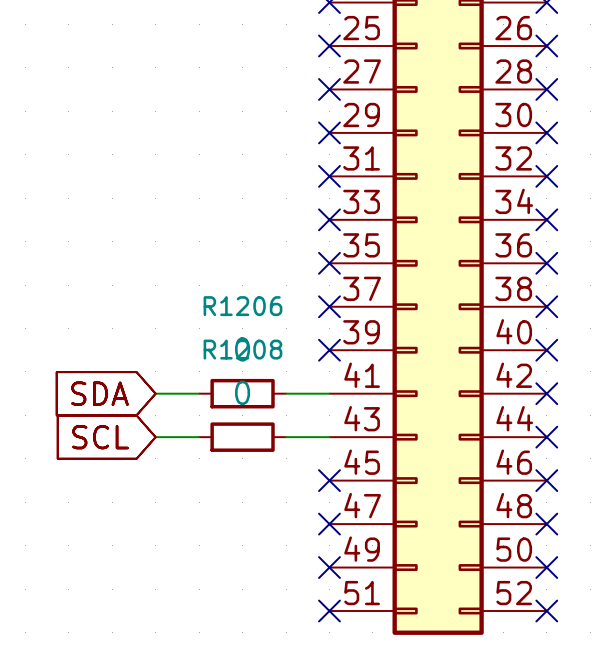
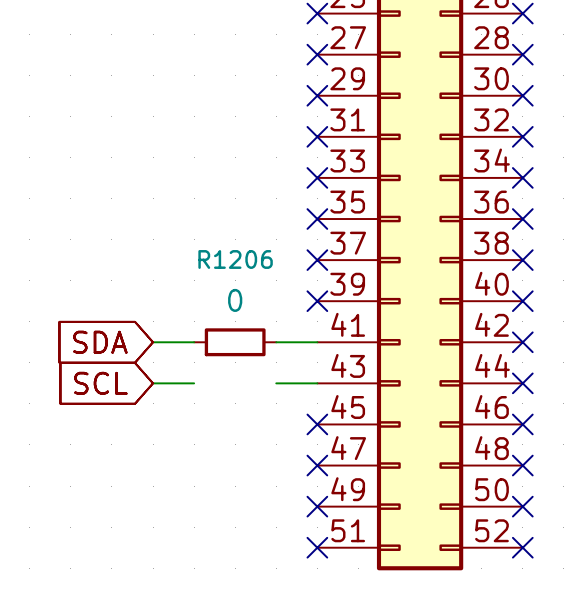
R1208: 0 (242, 437) -> none

